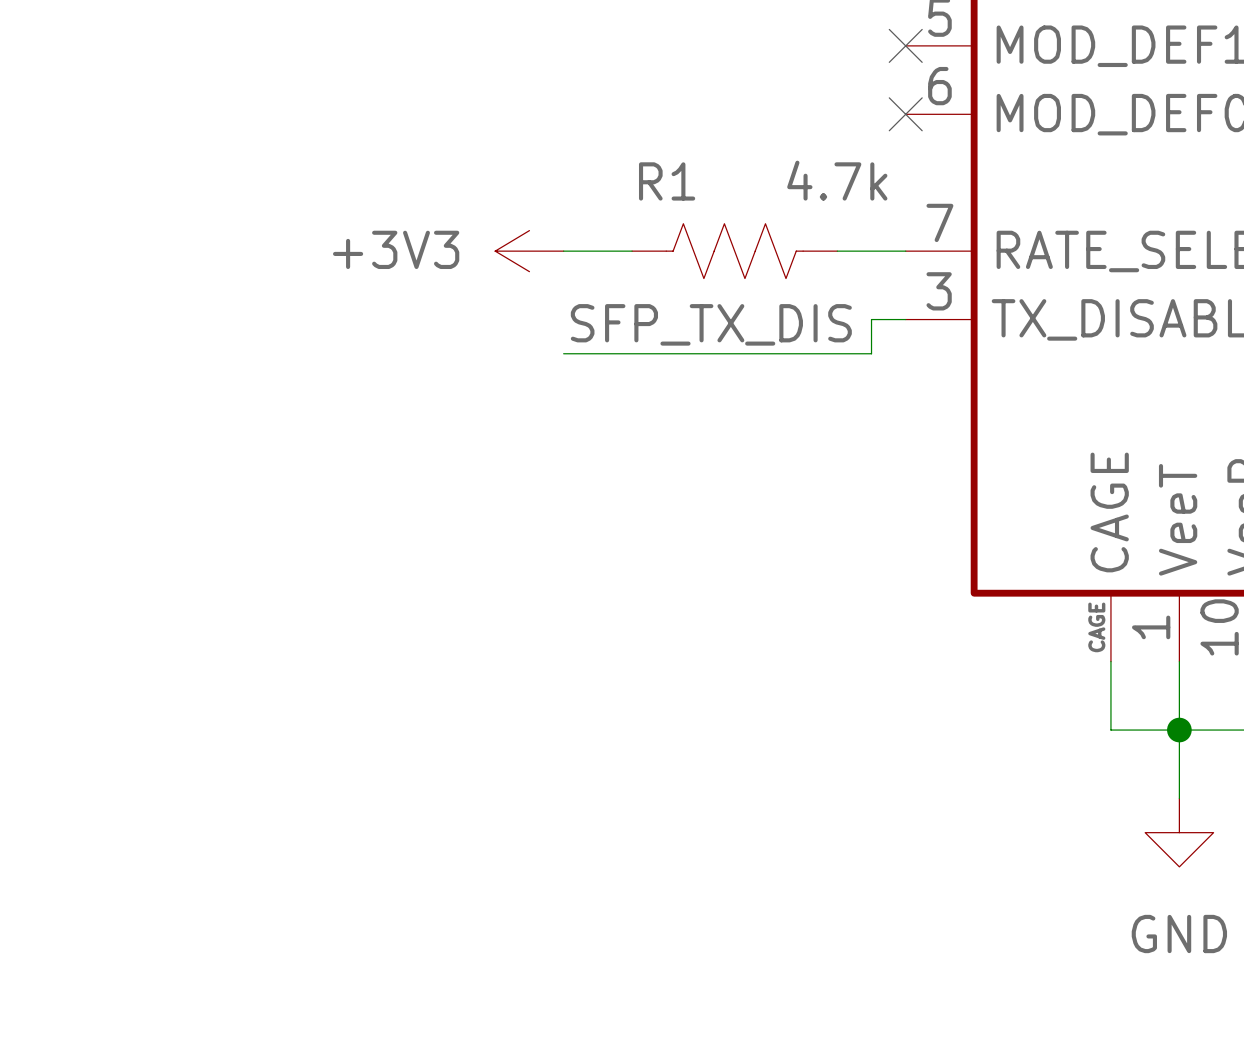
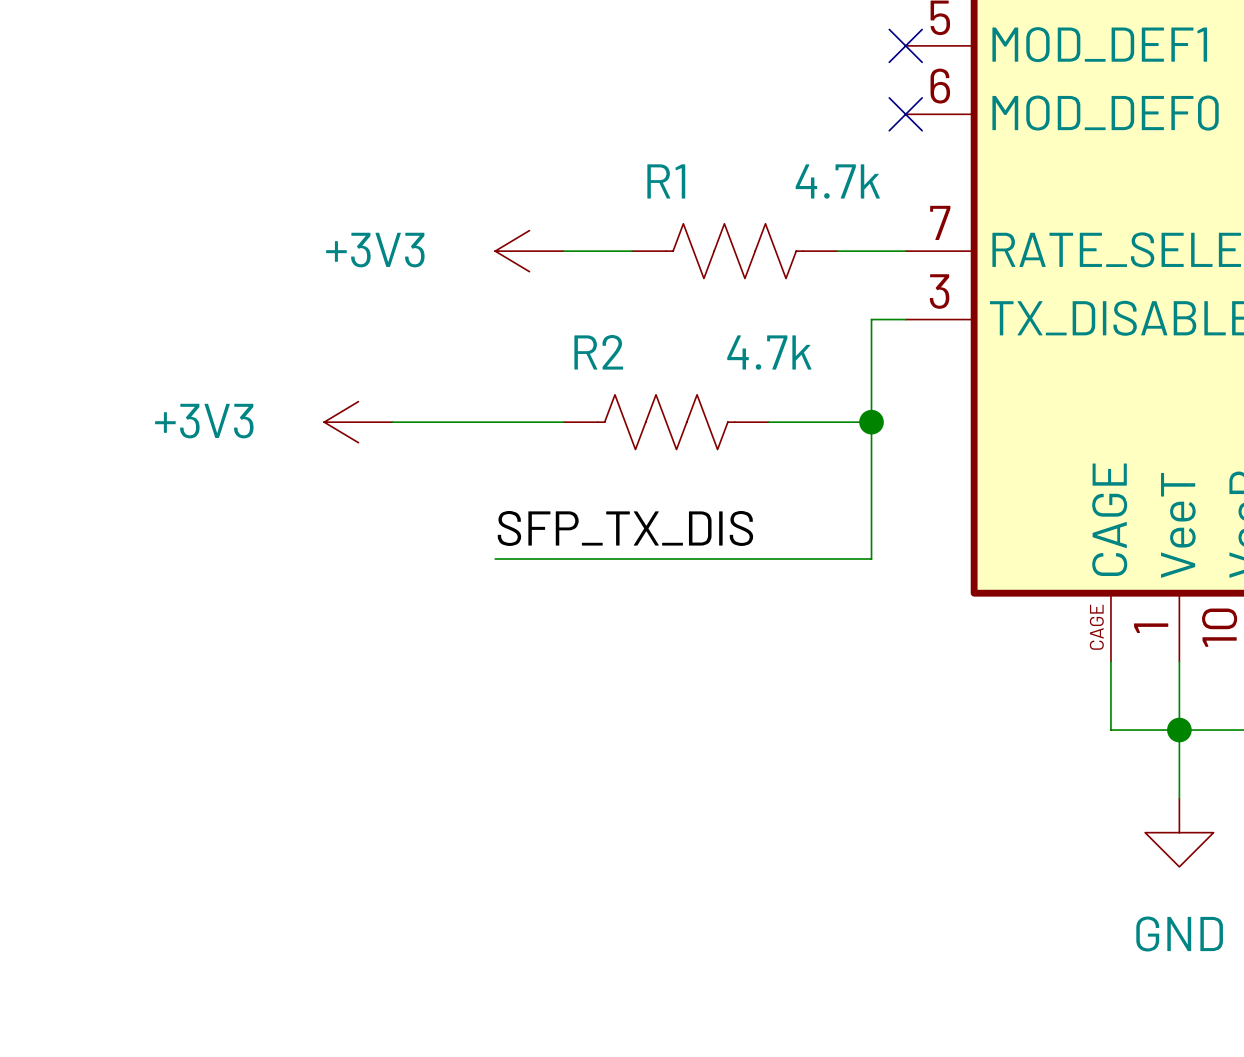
label position: SFP_TX_DIS (711, 324) -> SFP_TX_DIS (625, 528)
wire: (563, 353) (871, 353) -> (495, 559) (871, 559) (871, 353)
power symbol: none -> +3V3 (358, 422)
wire: none -> (392, 422) (563, 422)
R2: none -> 4.7k (666, 422)
wire: none -> (768, 422) (871, 422)
junction: none -> (871, 422)

